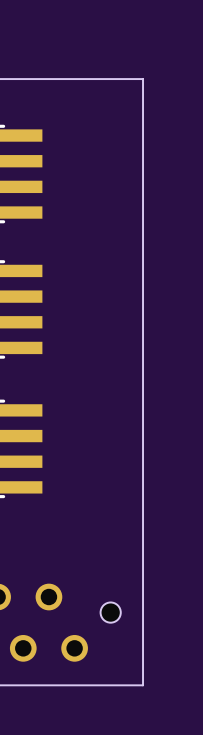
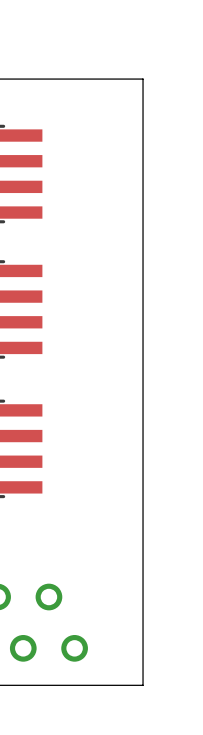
hole: (110, 612) -> none

